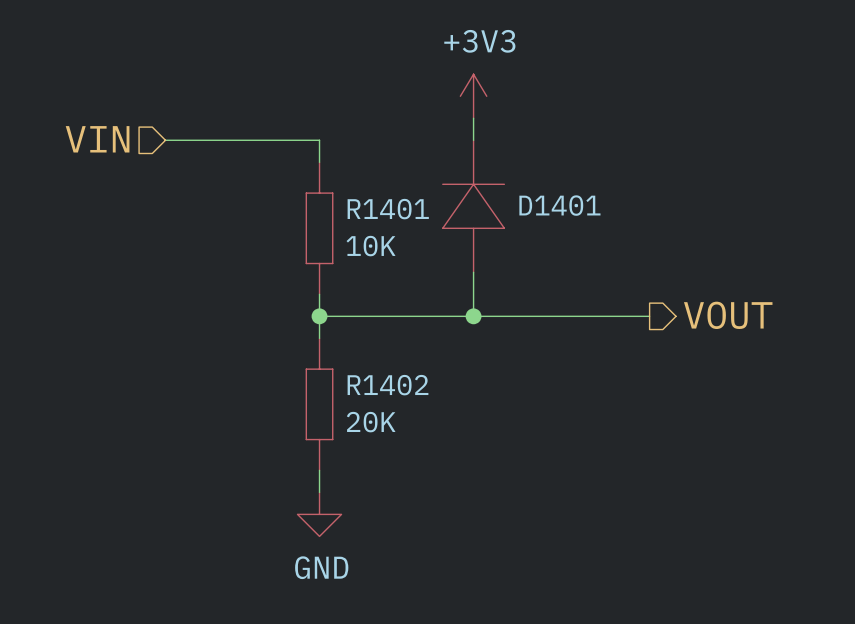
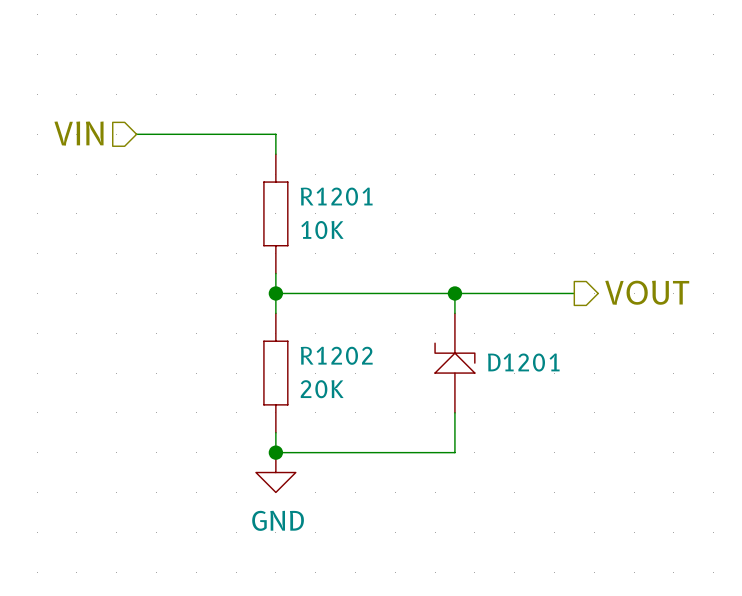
power symbol: +3V3 (473, 96) -> none
wire: (473, 118) (473, 140) -> (454, 293) (454, 313)
D1401: (473, 206) -> none
R1401 name: R1401 (388, 209) -> R1201 (336, 196)
wire: (473, 272) (473, 316) -> none
junction position: (473, 316) -> (454, 293)
R1402 name: R1402 (387, 385) -> R1202 (336, 355)
D1201: none -> (454, 363)
wire: none -> (454, 412) (454, 452) (275, 452)
junction: none -> (275, 452)

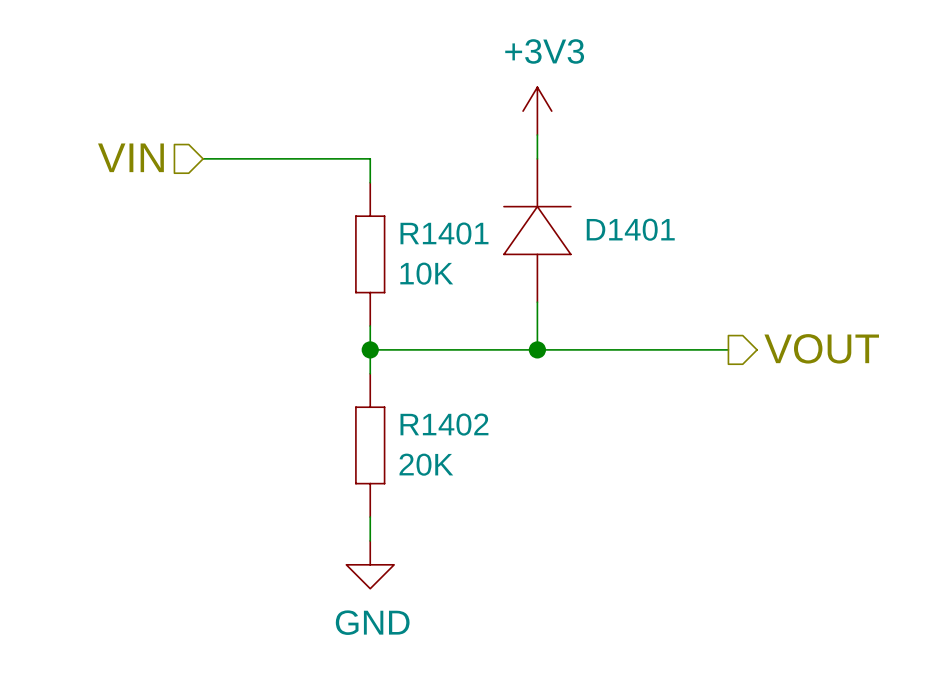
power symbol: none -> +3V3 (537, 111)
D1401: none -> (537, 230)
R1201 name: R1201 (336, 196) -> R1401 (444, 233)
wire: none -> (537, 302) (537, 349)
wire: (454, 293) (454, 313) -> (537, 135) (537, 158)
junction position: (454, 293) -> (537, 349)
R1202 name: R1202 (336, 355) -> R1402 (444, 424)
D1201: (454, 363) -> none
wire: (454, 412) (454, 452) (275, 452) -> none
junction: (275, 452) -> none

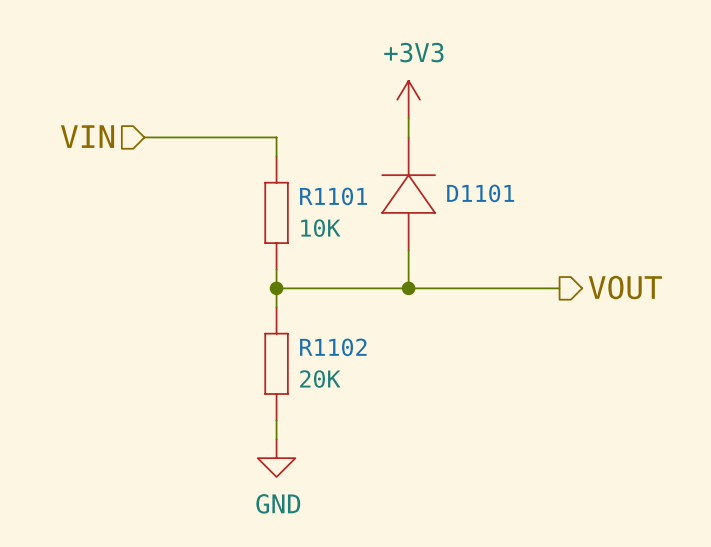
D1401 name: D1401 (630, 229) -> D1101 (480, 193)
R1401 name: R1401 (444, 233) -> R1101 (333, 196)
R1402 name: R1402 (444, 424) -> R1102 (333, 347)

